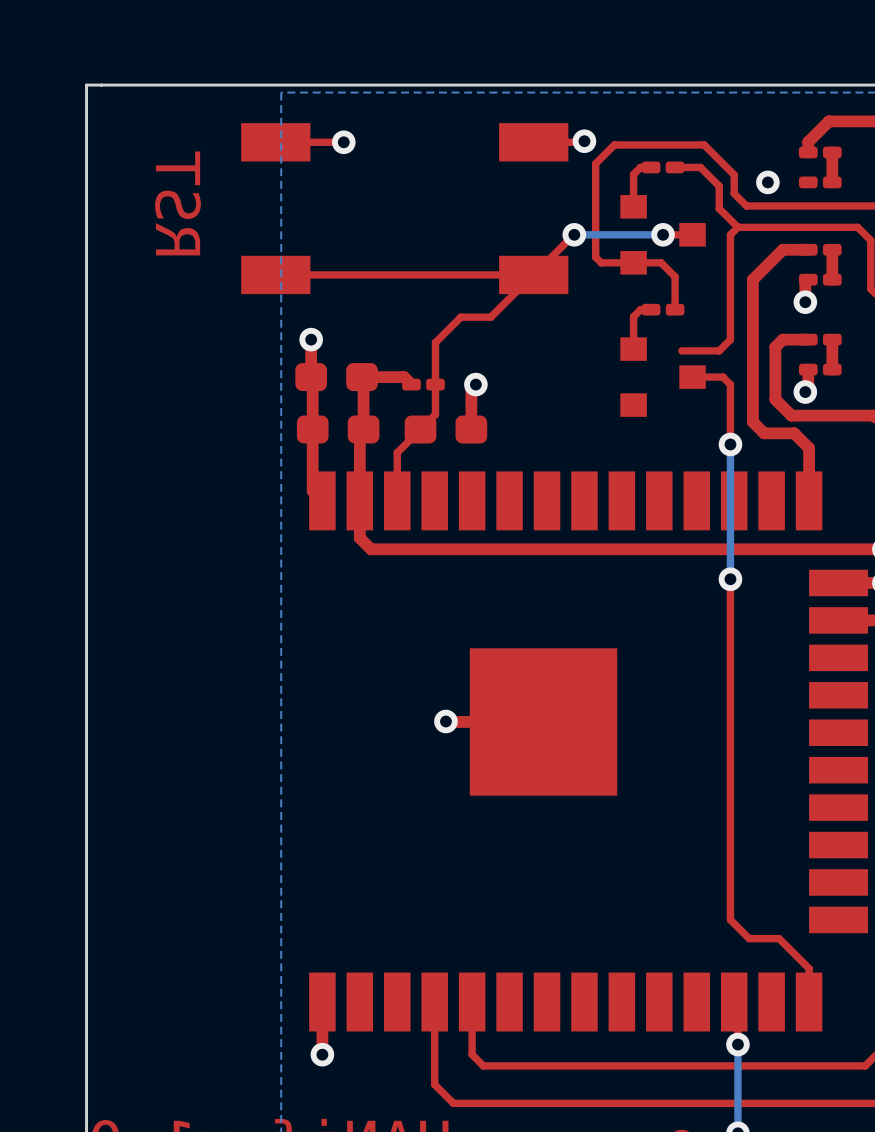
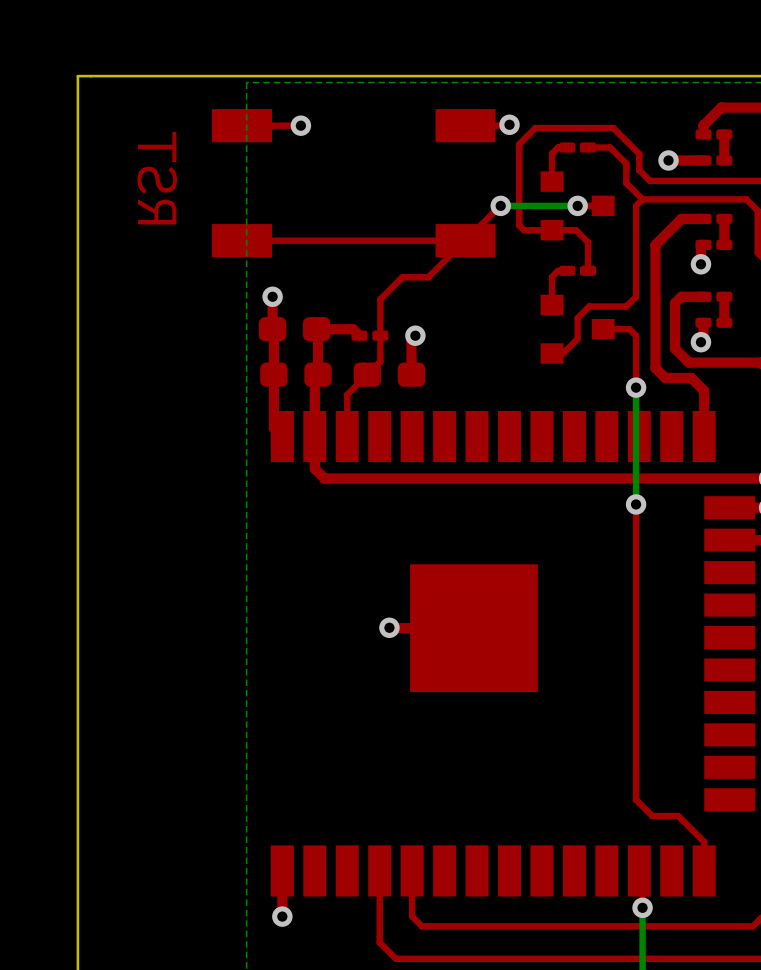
top track: none -> (703, 160) (668, 160)
top track: none -> (593, 306) (589, 306) (577, 318) (577, 338) (563, 353) (552, 353)

